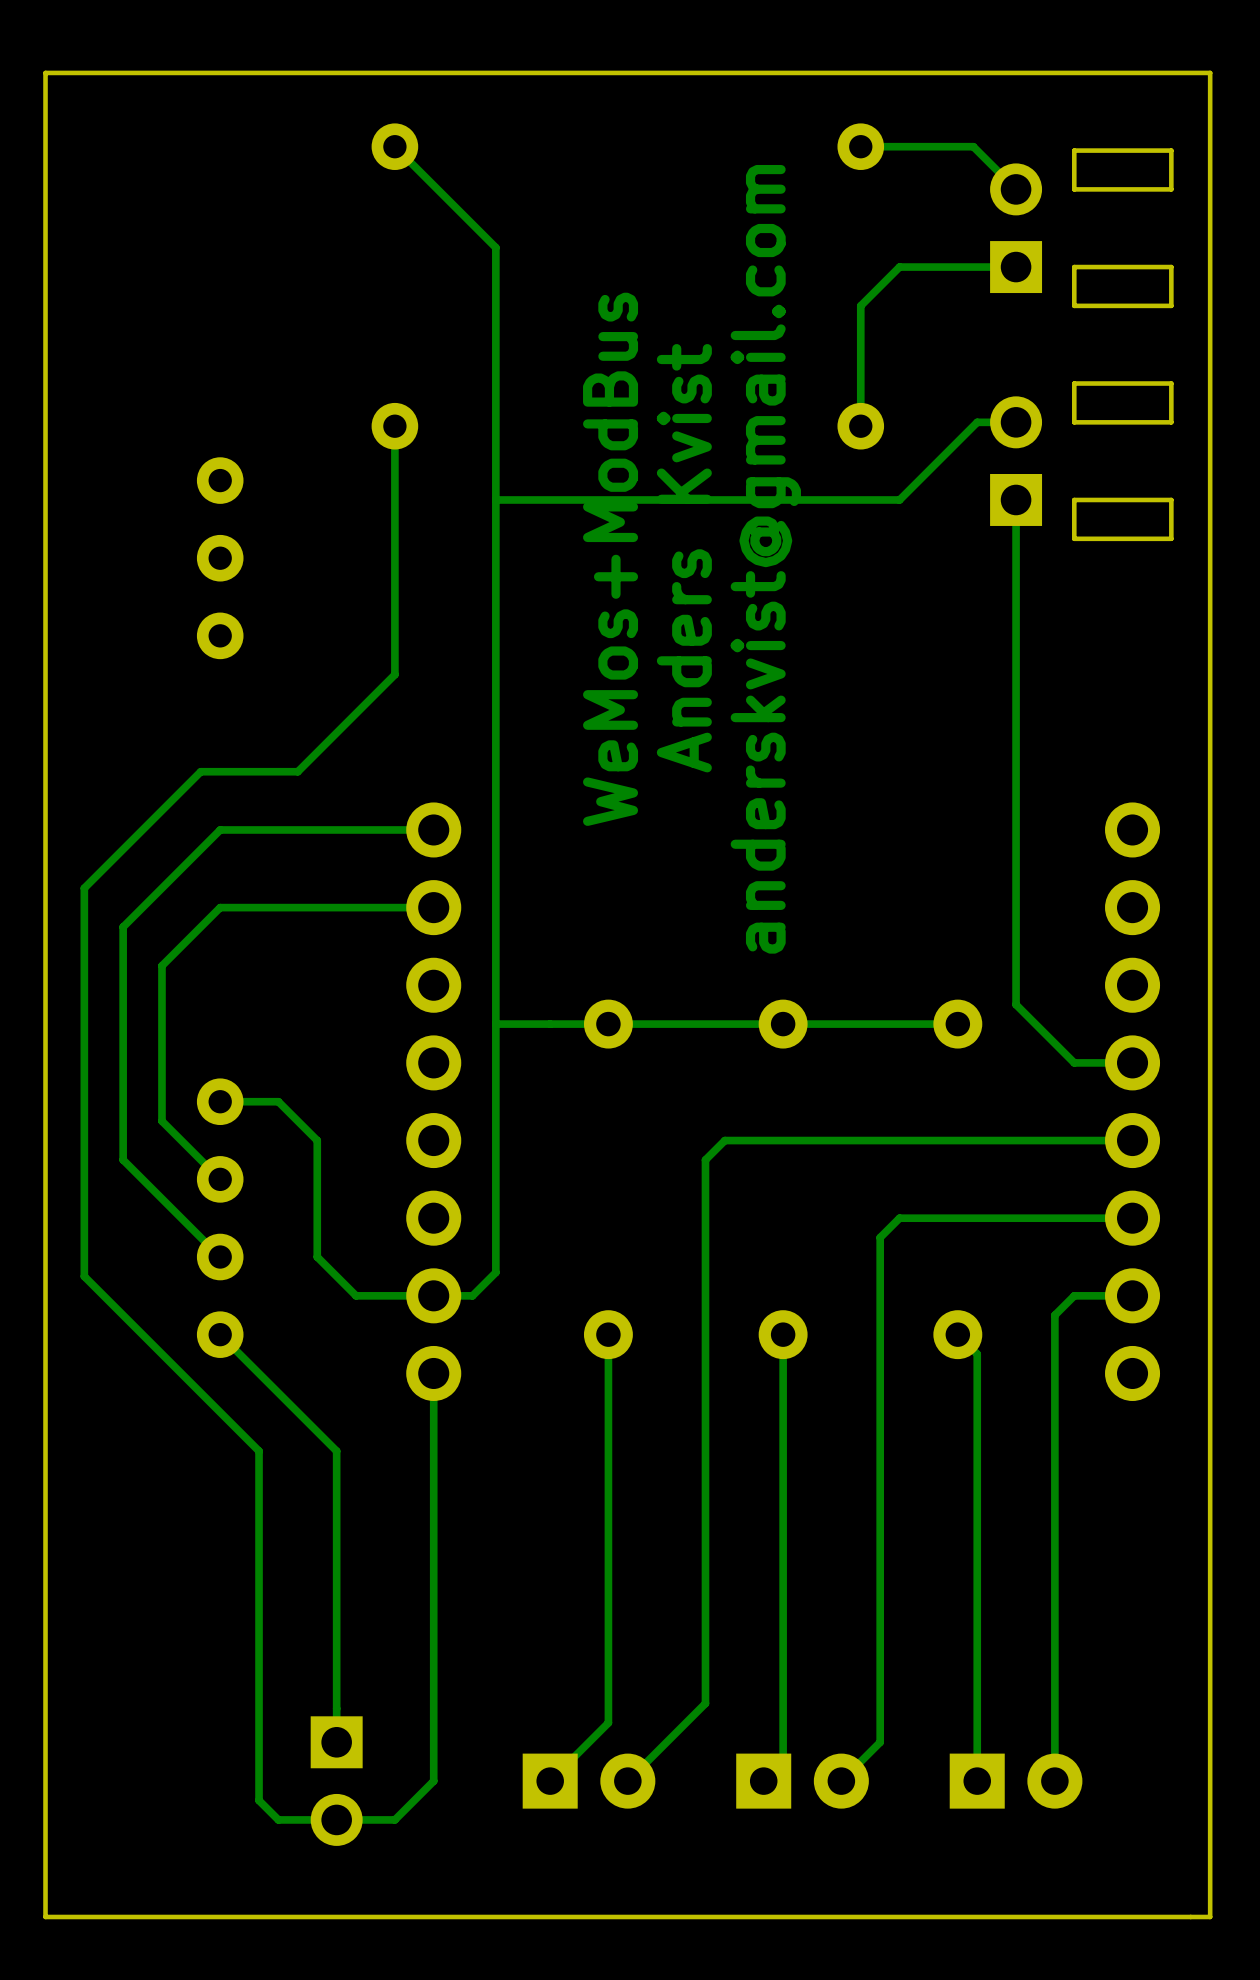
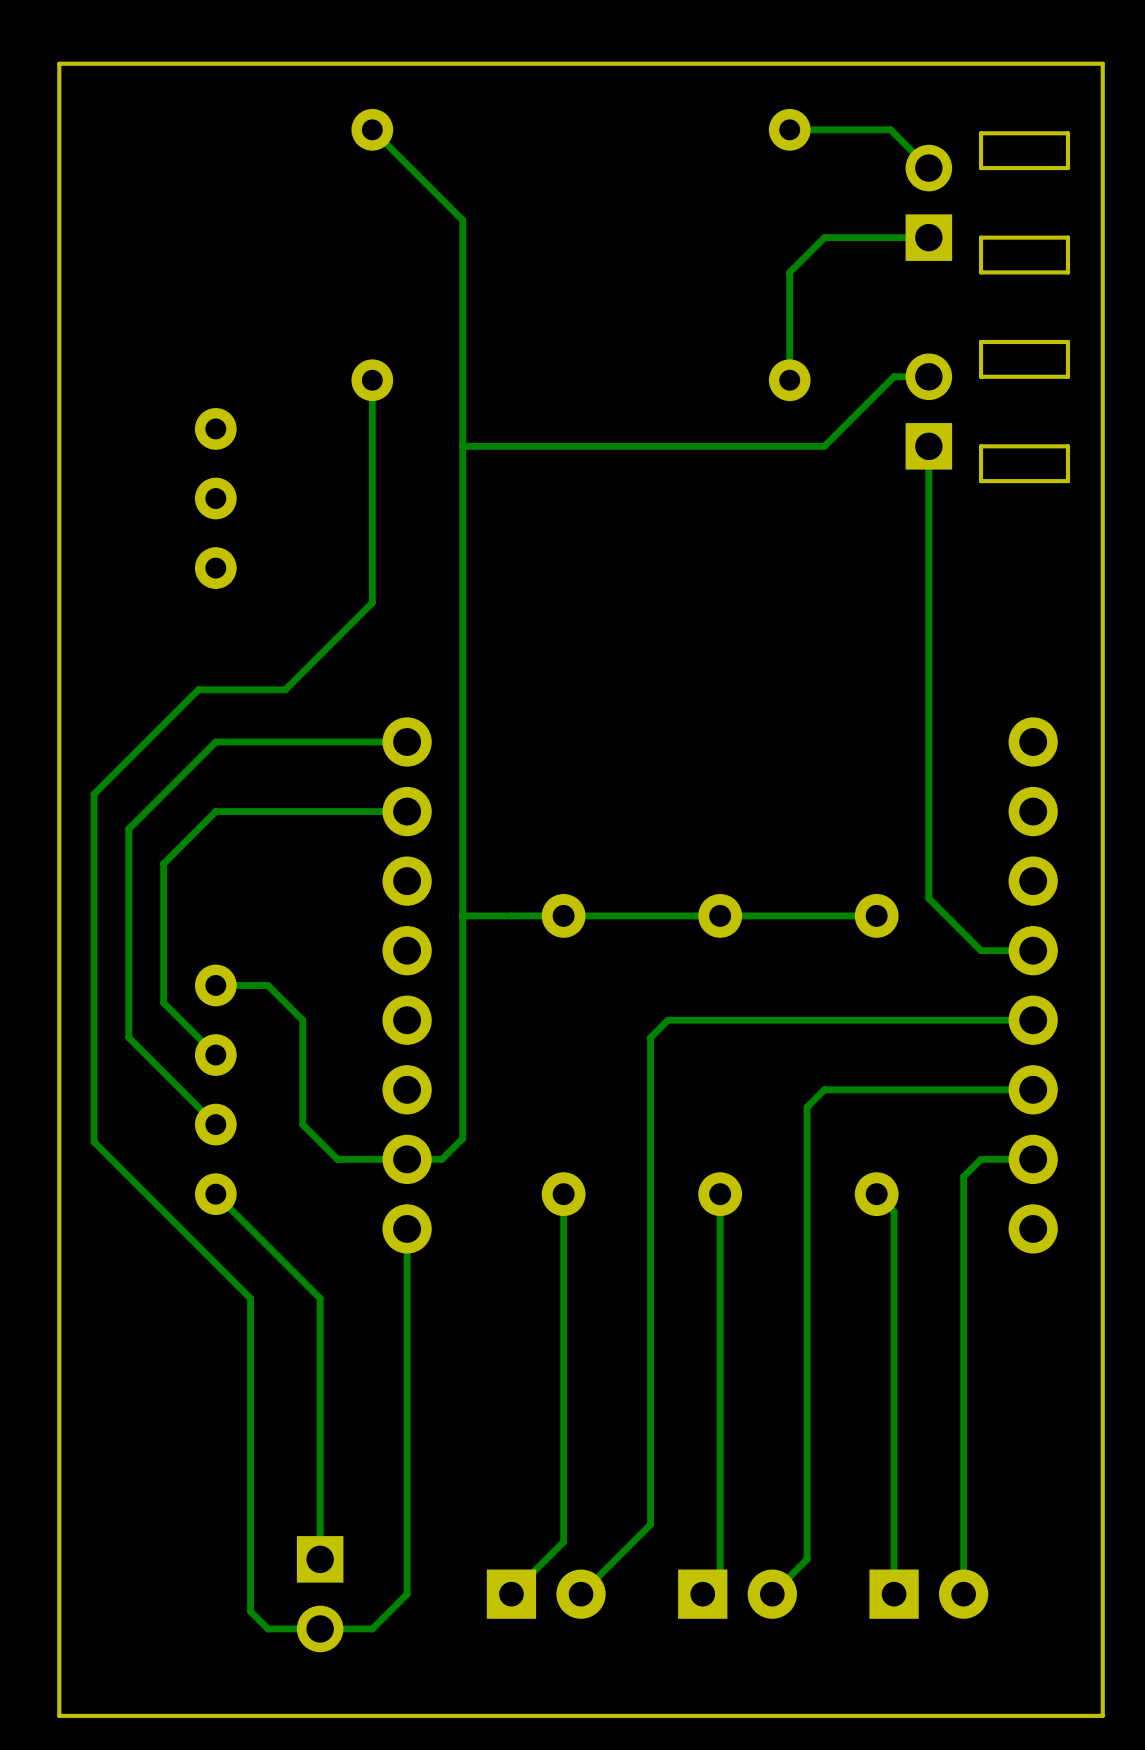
text: Anders Kvist (684, 558) -> none
text: WeMos+ModBus (610, 559) -> none
text: anderskvist@gmail.com (765, 559) -> none

